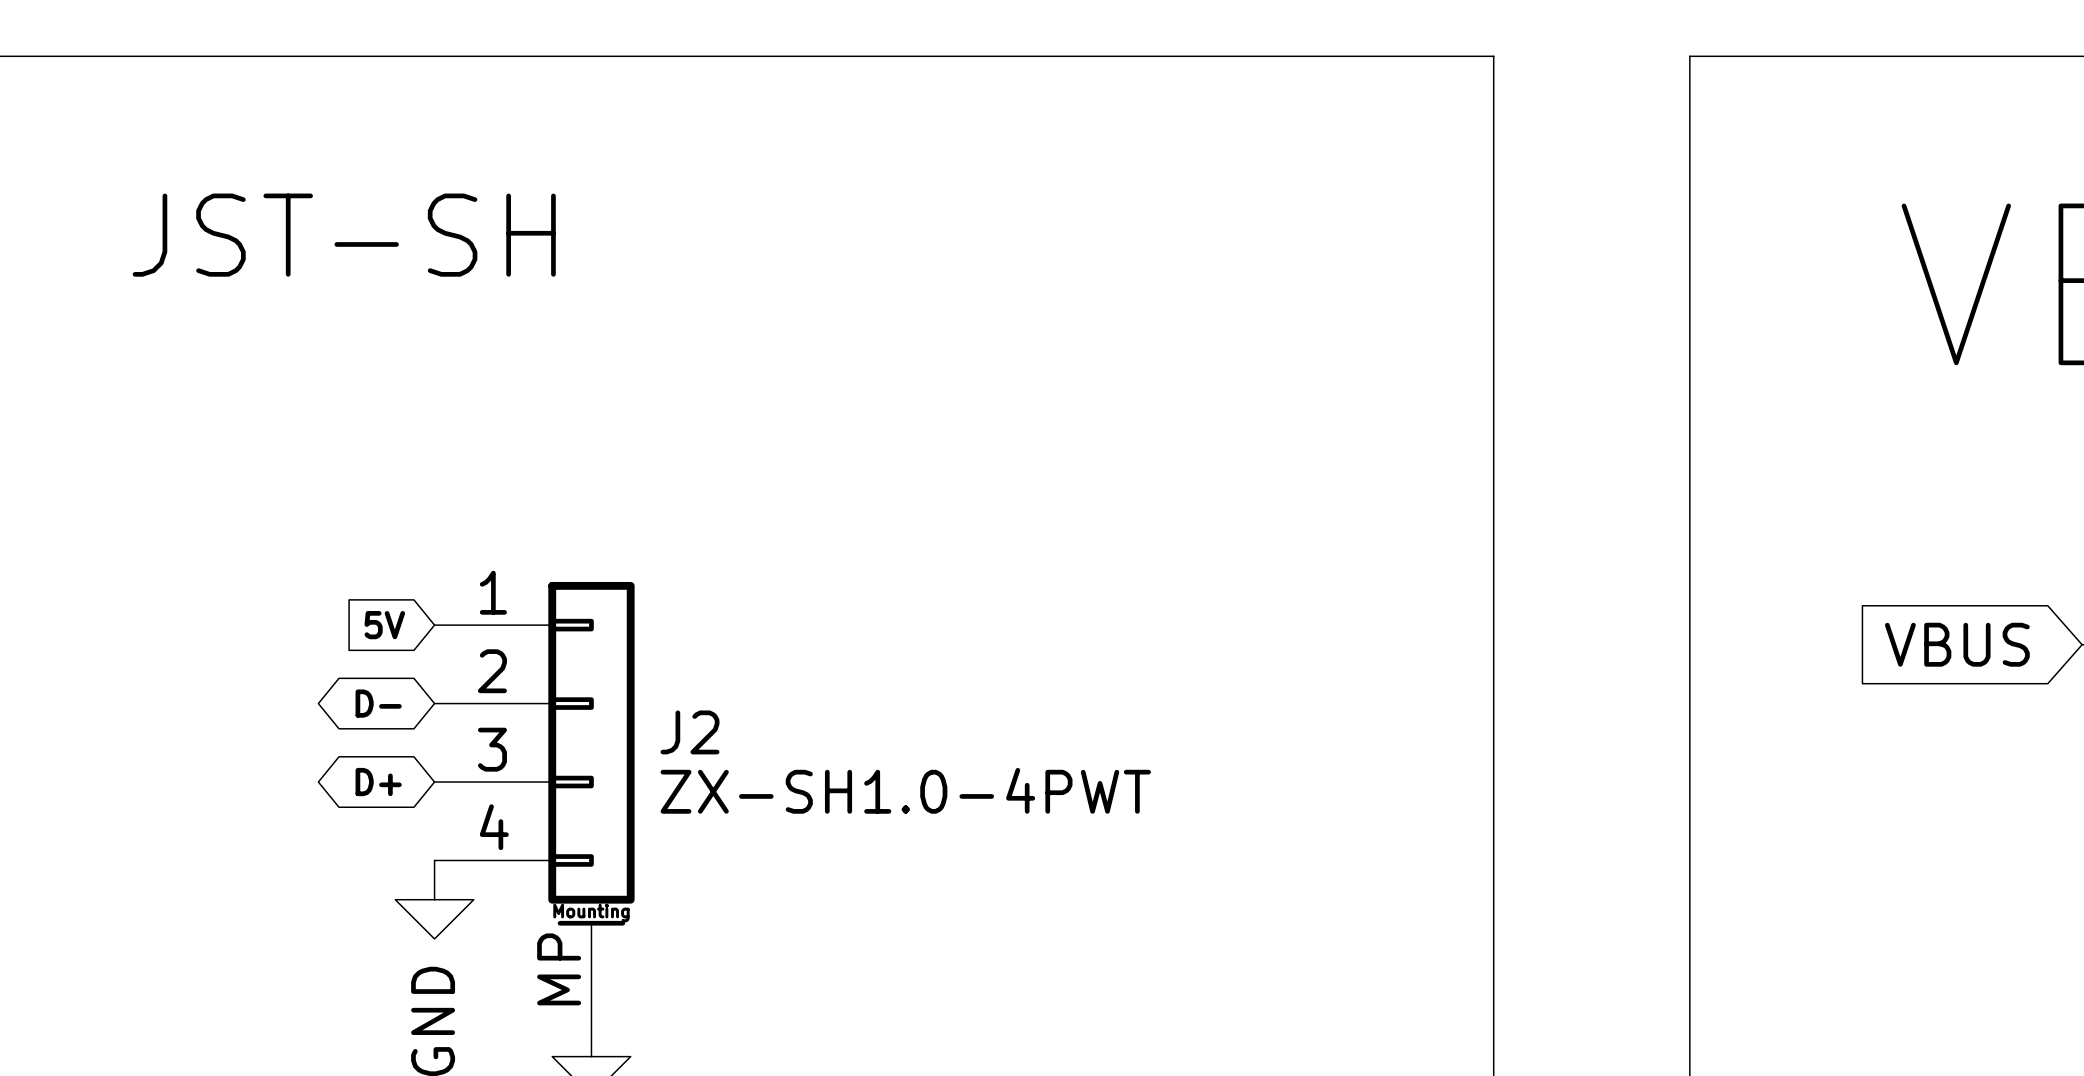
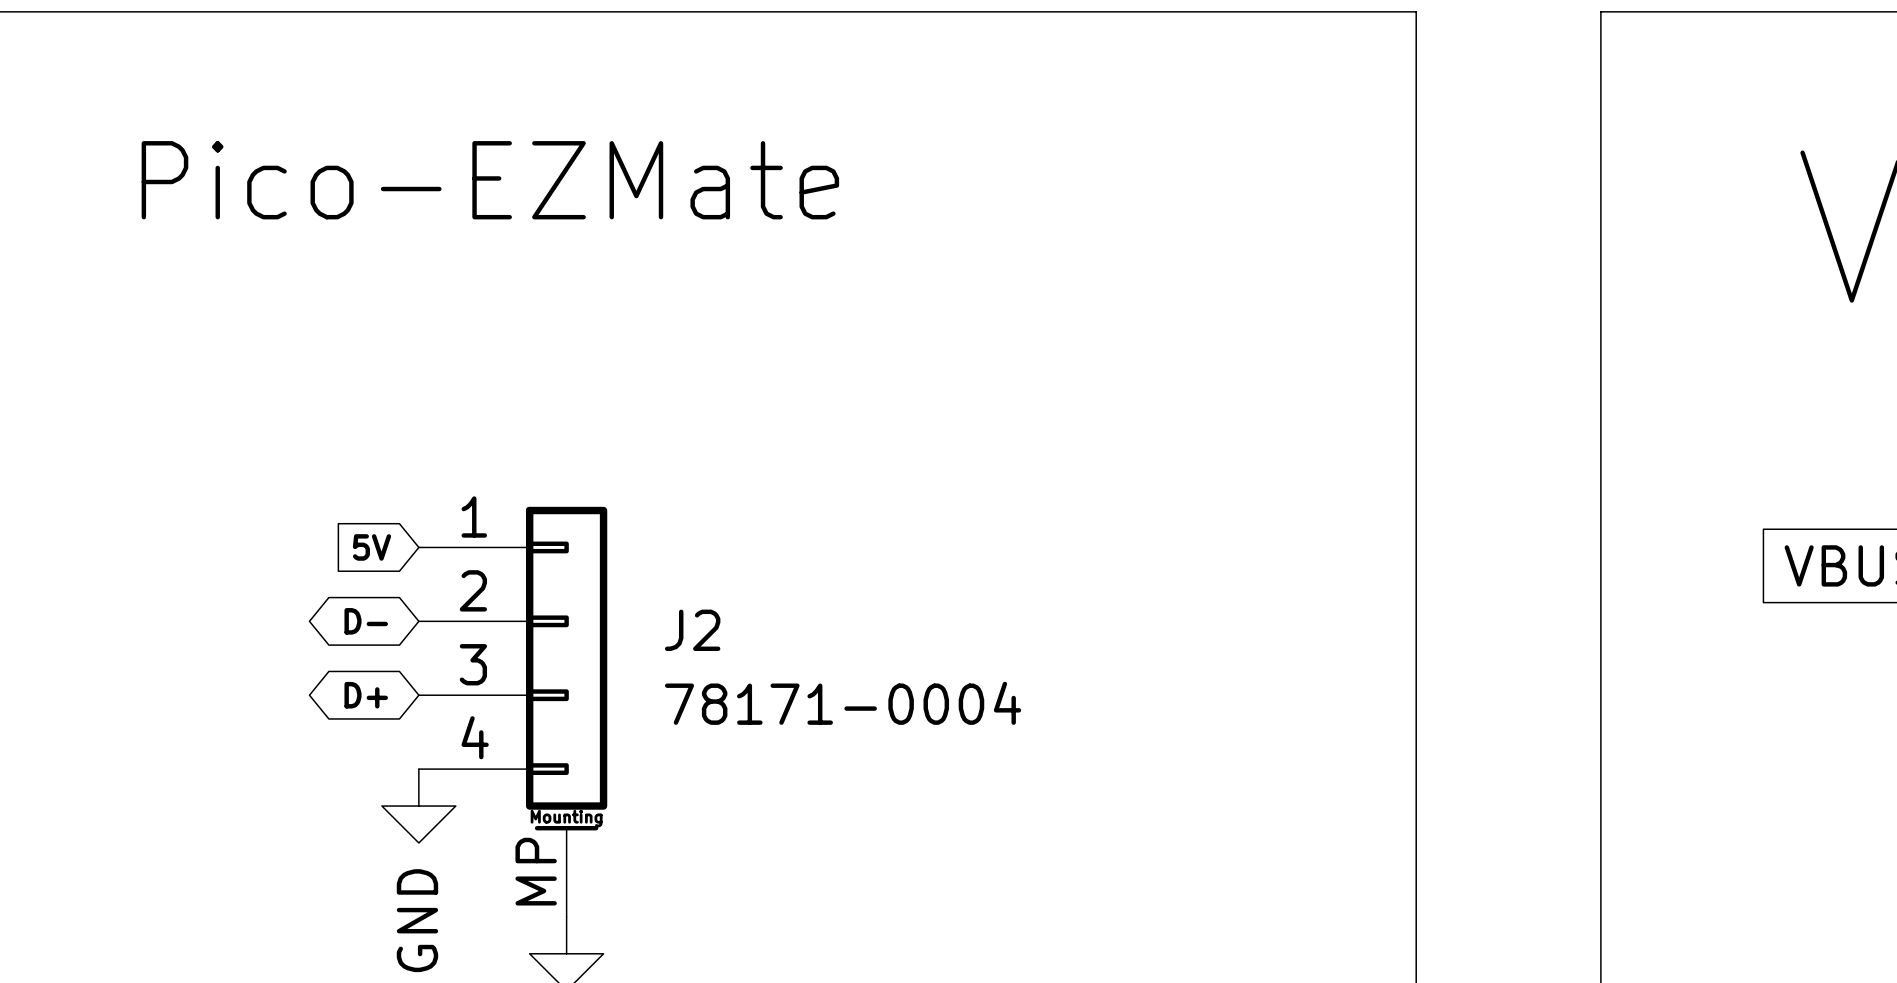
text: JST-SH (344, 235) -> Pico-EZMate (490, 180)
J2 name position: J2 (690, 732) -> J2 (692, 630)
J2 value: ZX-SH1.0-4PWT (905, 790) -> 78171-0004 (843, 703)

